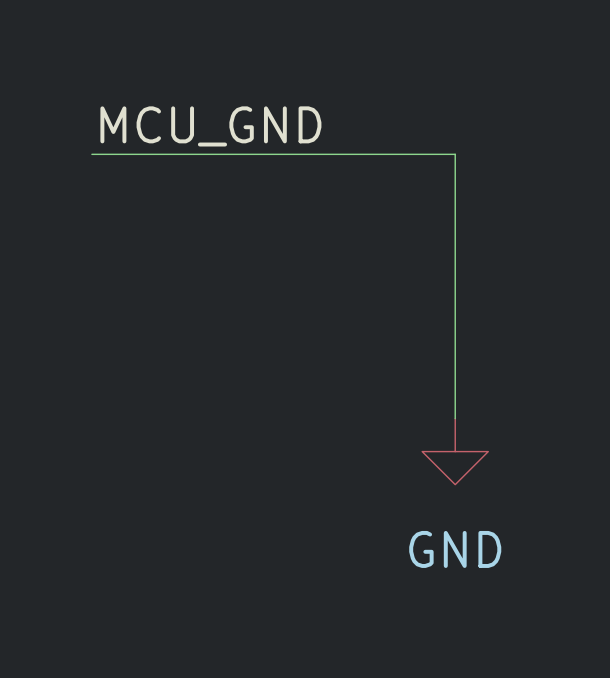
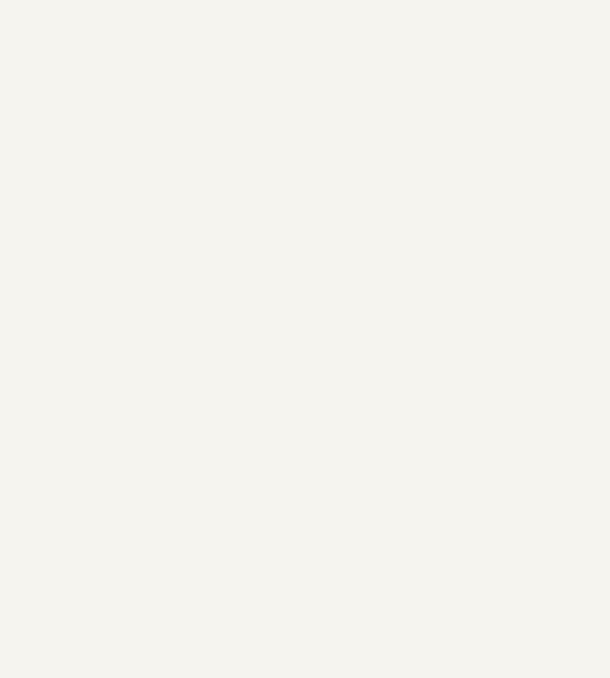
label: MCU_GND (210, 126) -> none
wire: (91, 154) (455, 154) (455, 418) -> none
power symbol: GND (455, 451) -> none

